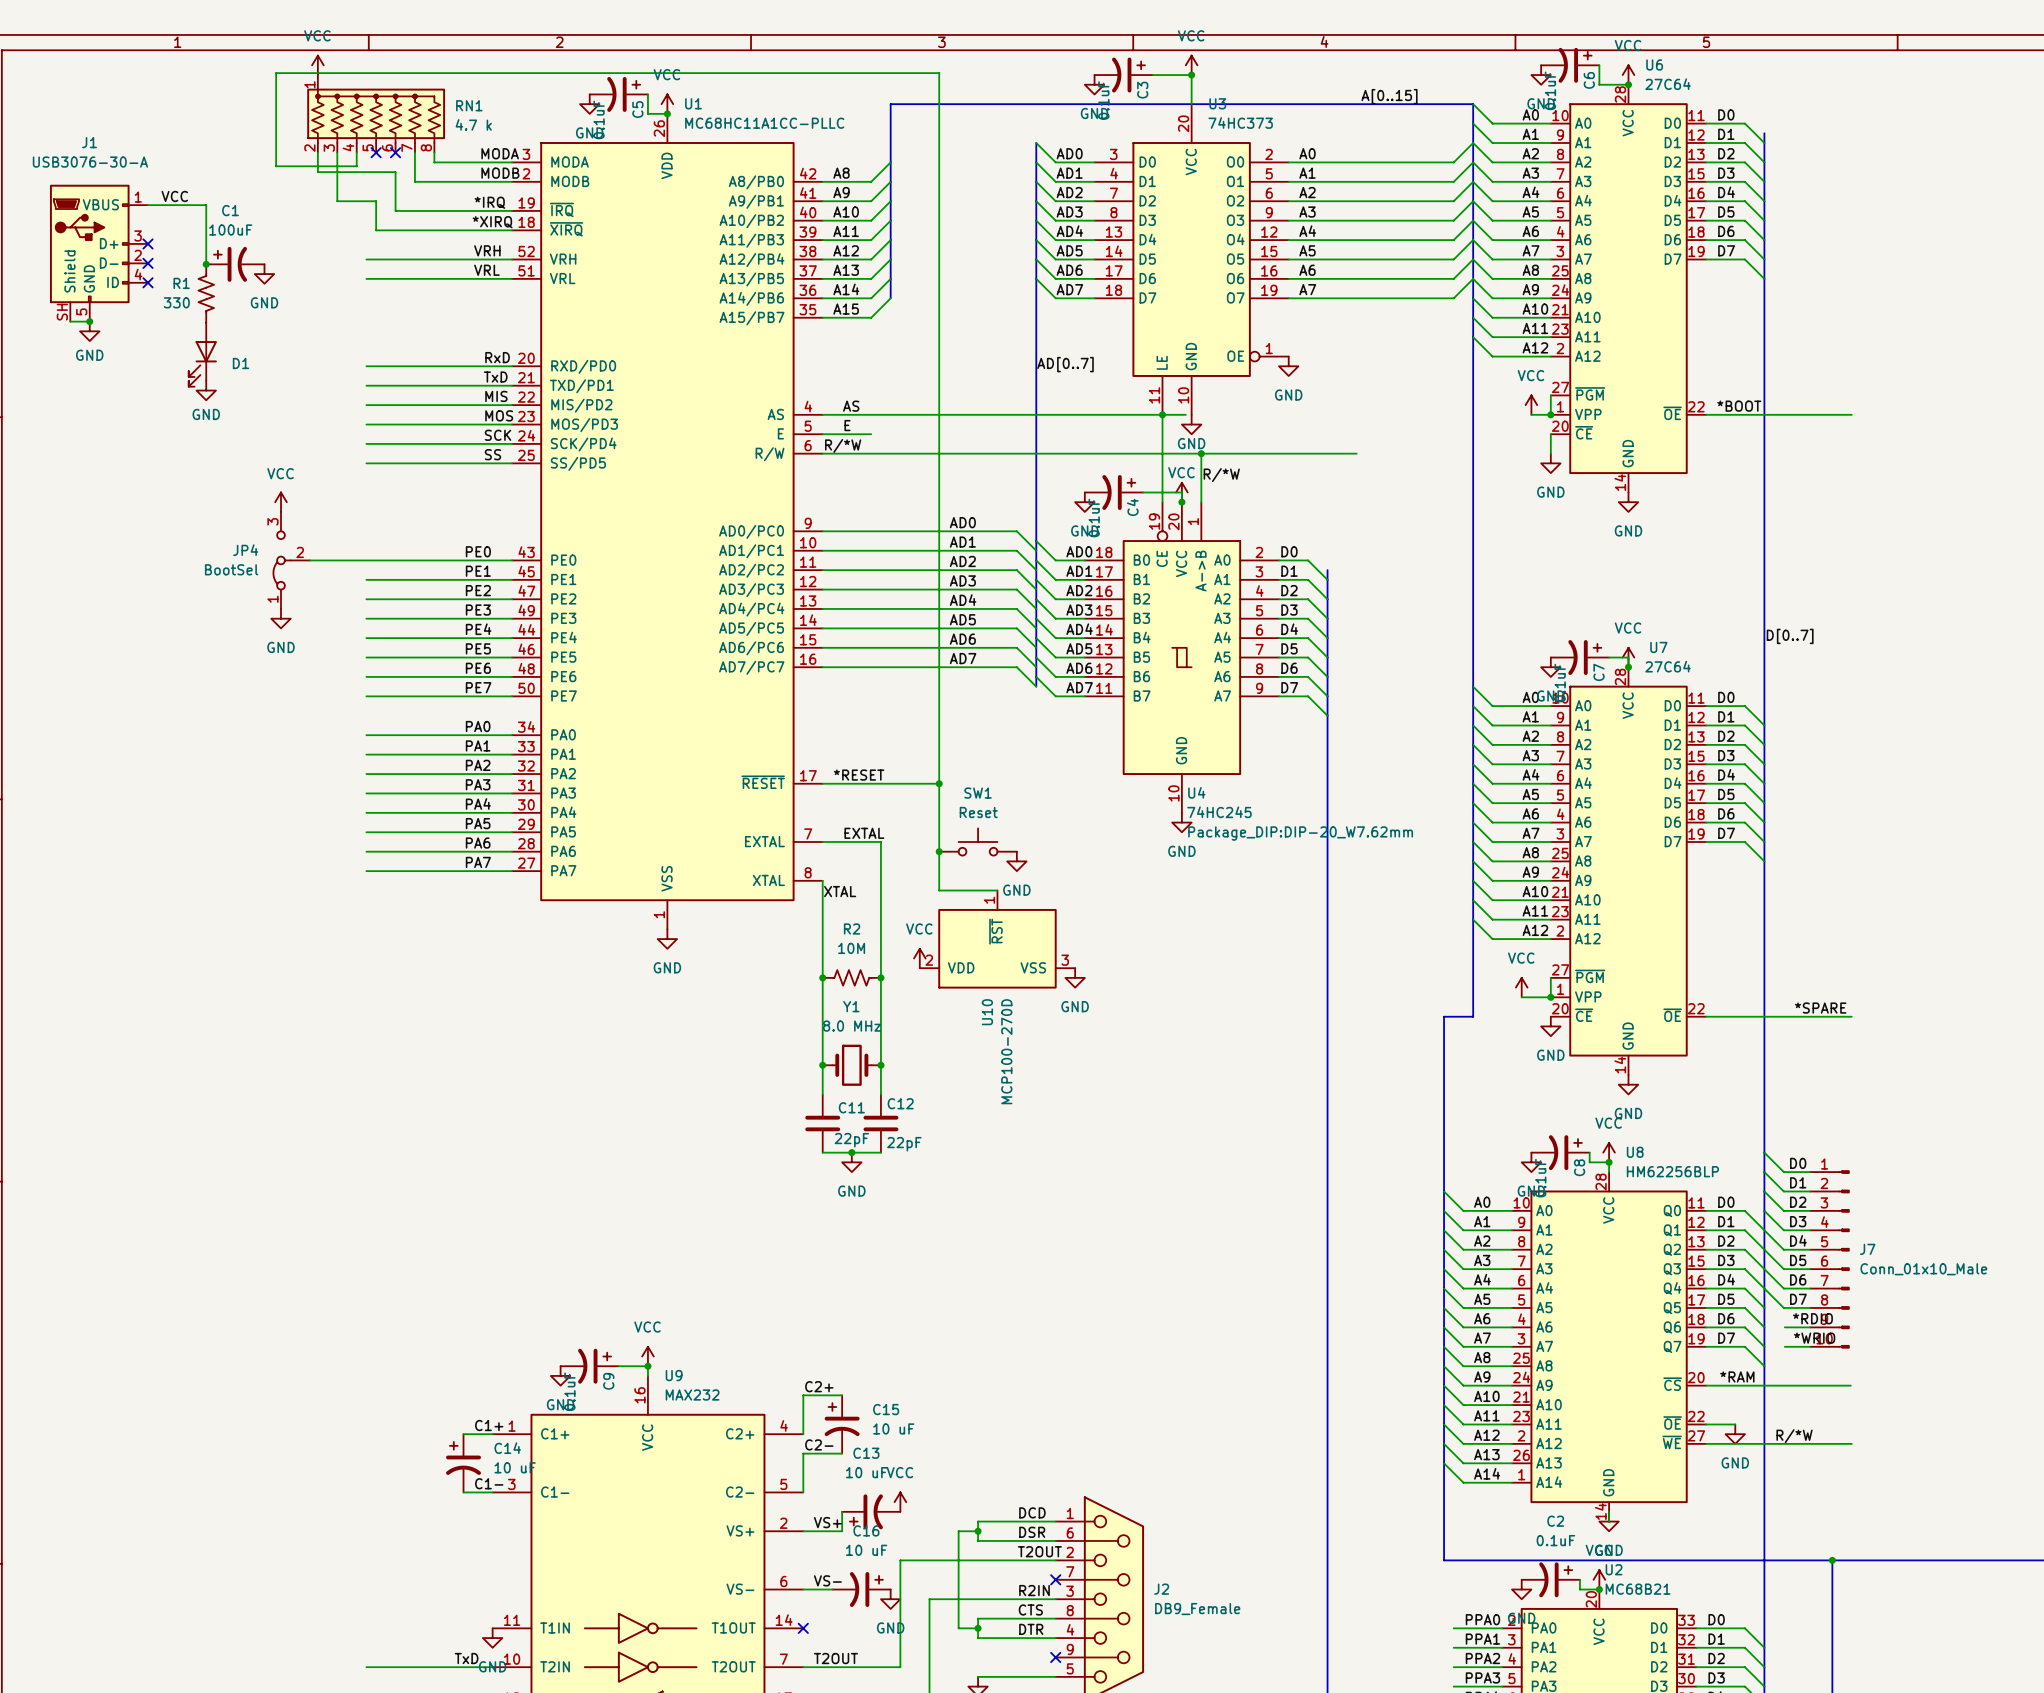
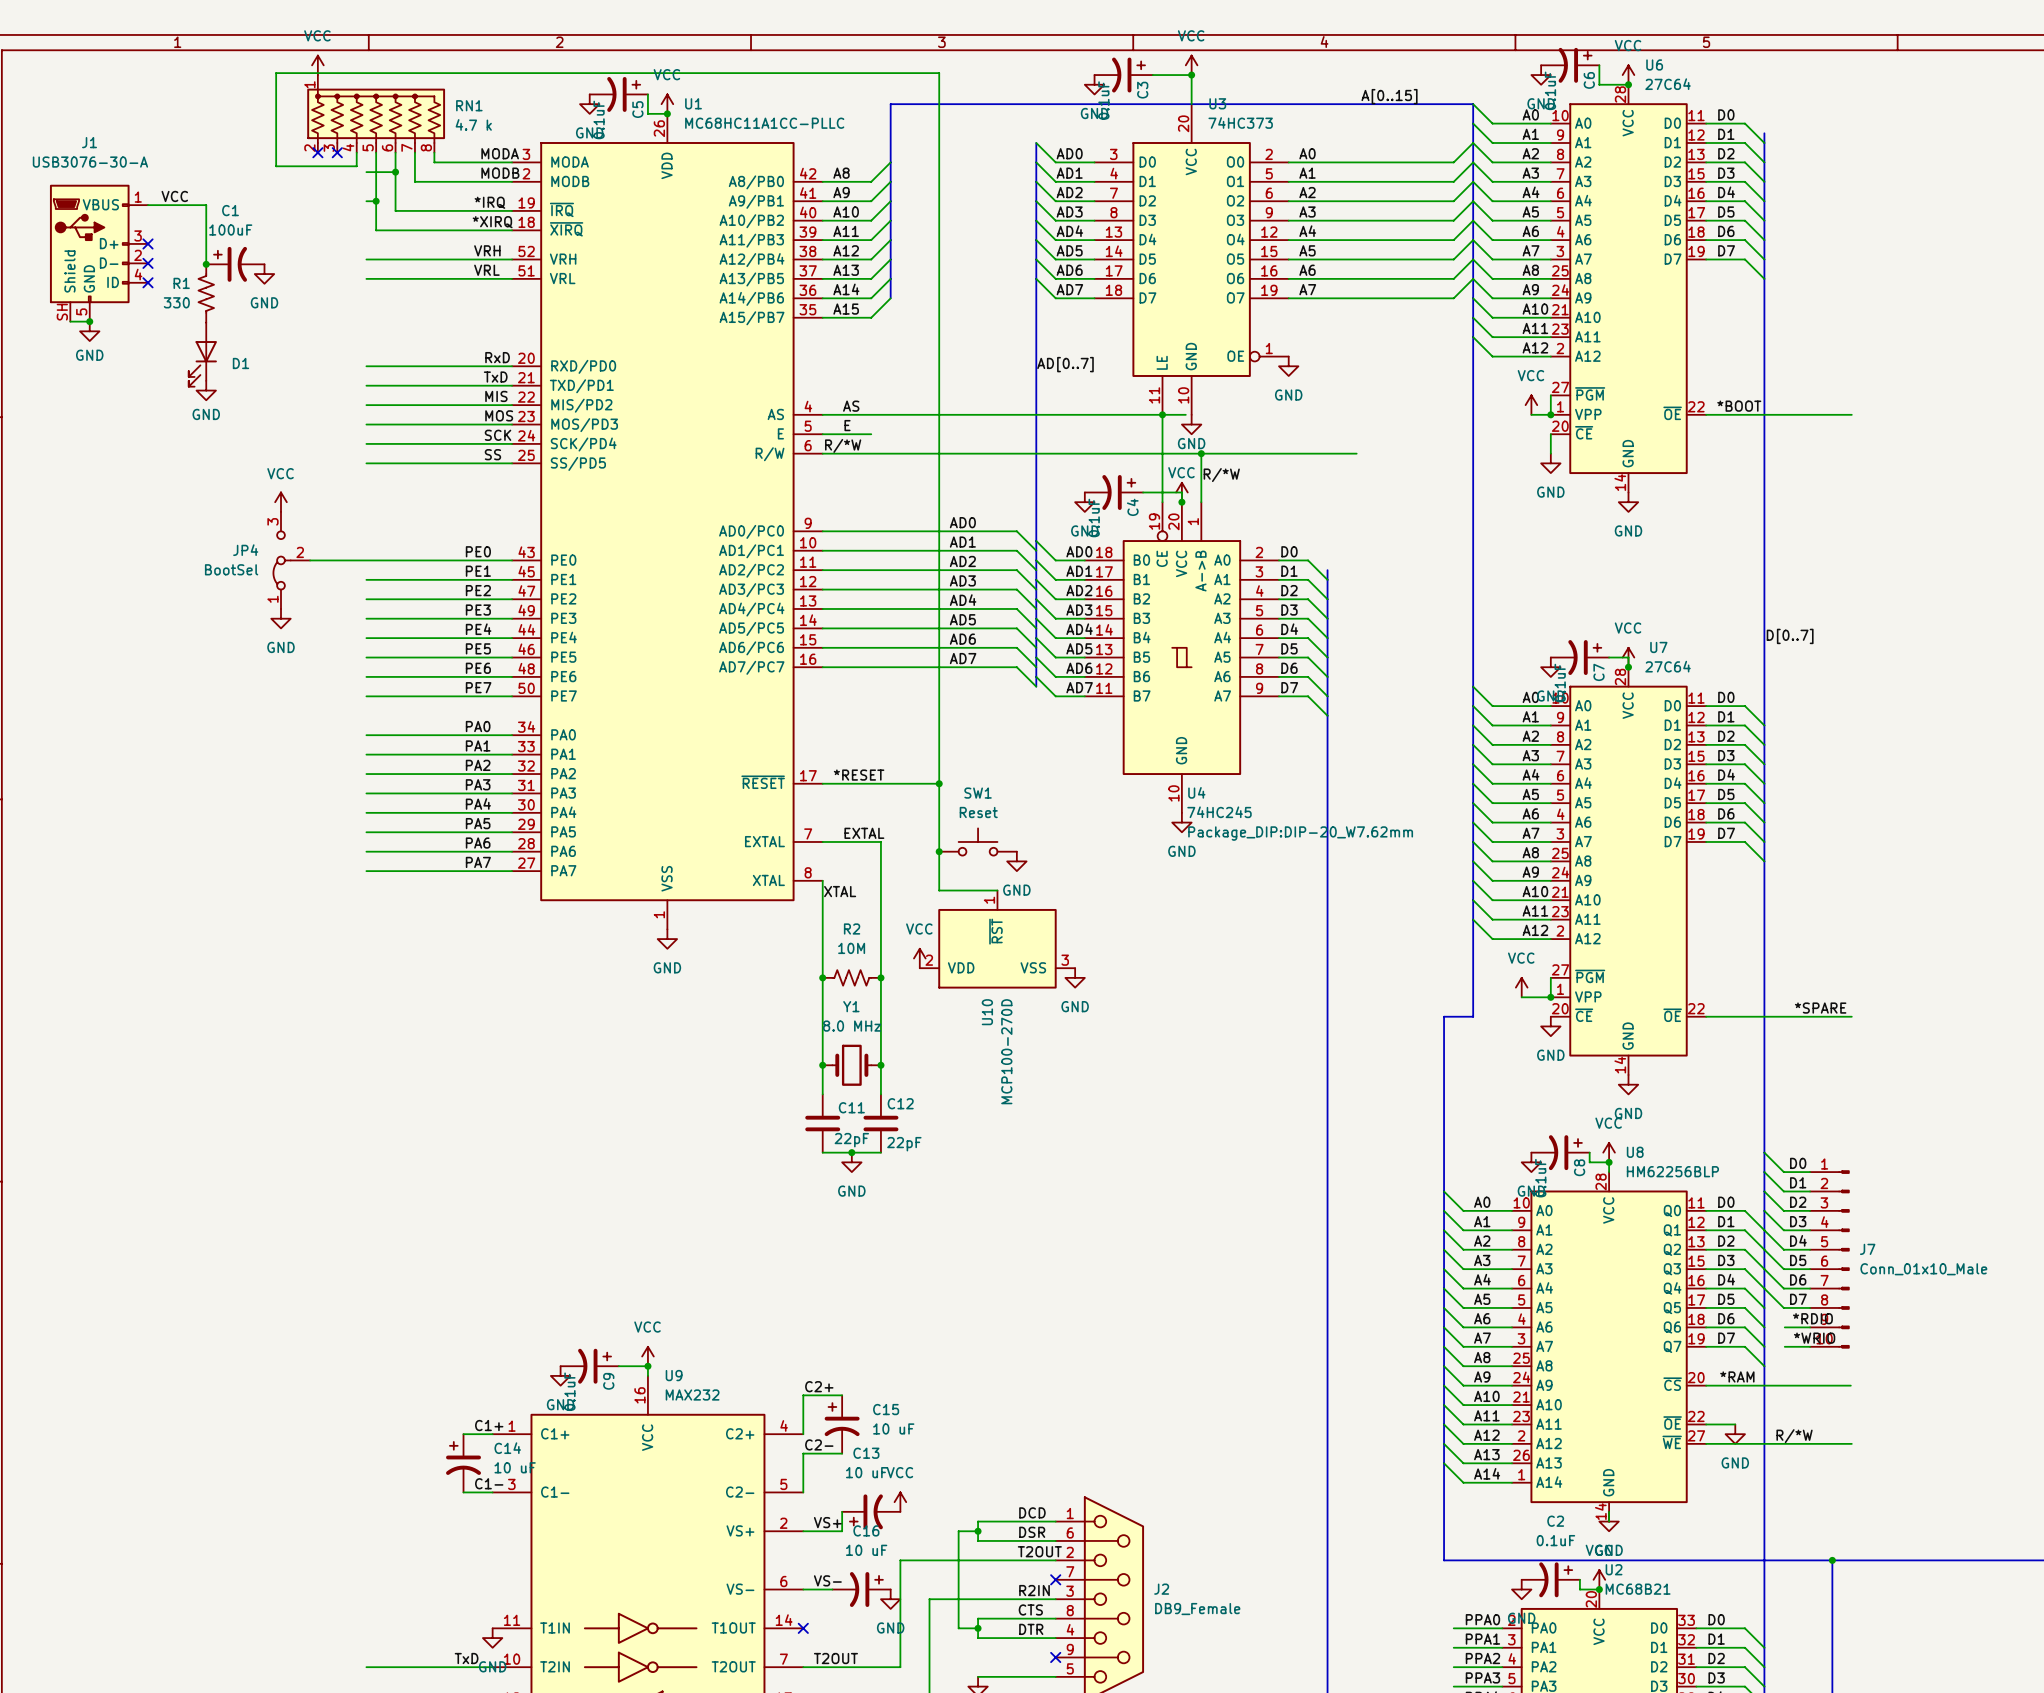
wire: (317, 152) (317, 172) (366, 172) -> none
no-connect mark: none -> (317, 152)
wire: (337, 152) (337, 201) (366, 201) -> none
no-connect mark: none -> (337, 152)
wire: none -> (376, 152) (376, 201)
no-connect mark: (376, 152) -> none
wire: none -> (395, 152) (395, 172)
no-connect mark: (395, 152) -> none
junction: none -> (395, 172)
junction: none -> (376, 201)

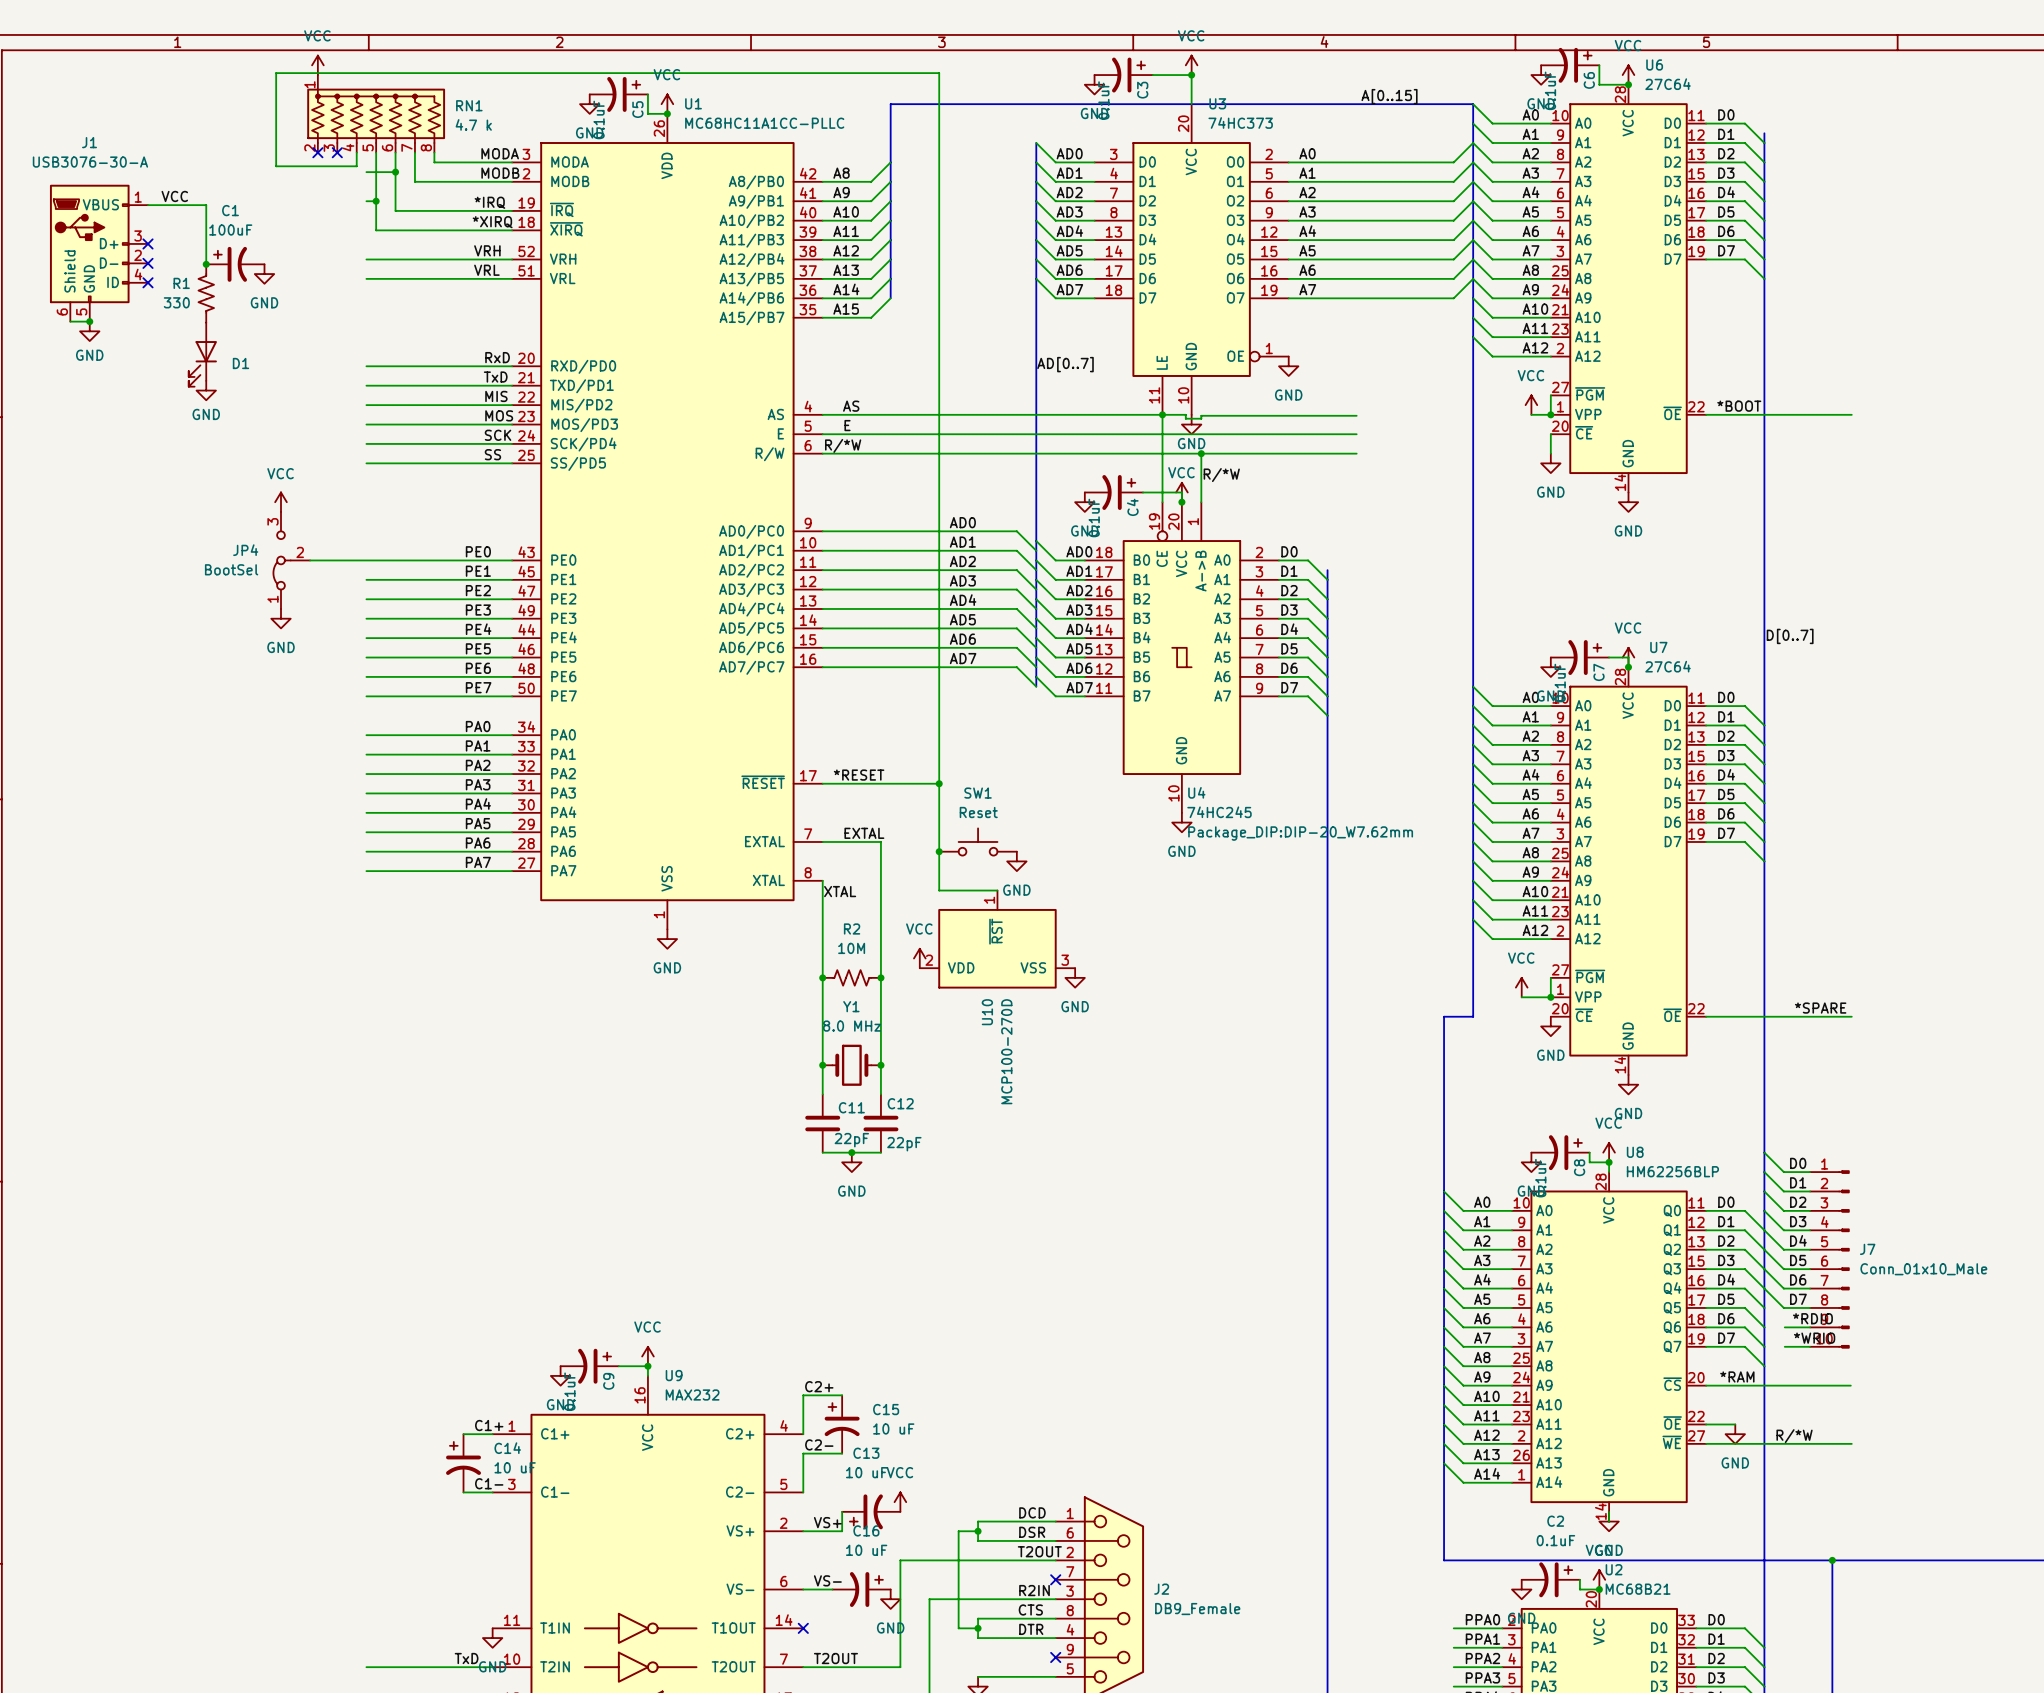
J1 pin number: SH (62, 312) -> 6 (62, 311)
wire: none -> (1185, 414) (1185, 418) (1201, 418) (1201, 415) (1356, 415)
wire: none -> (871, 434) (1356, 434)

